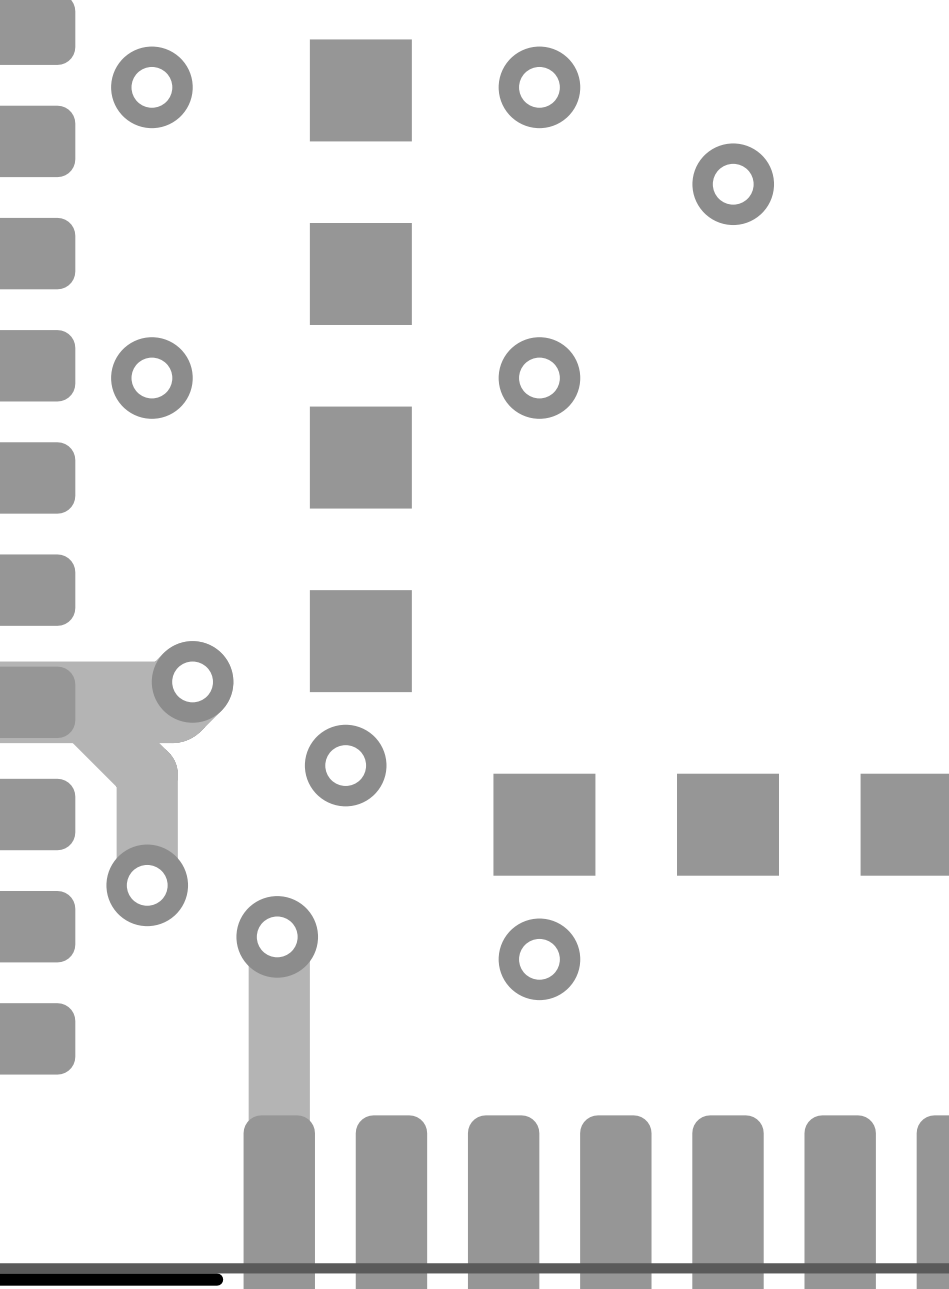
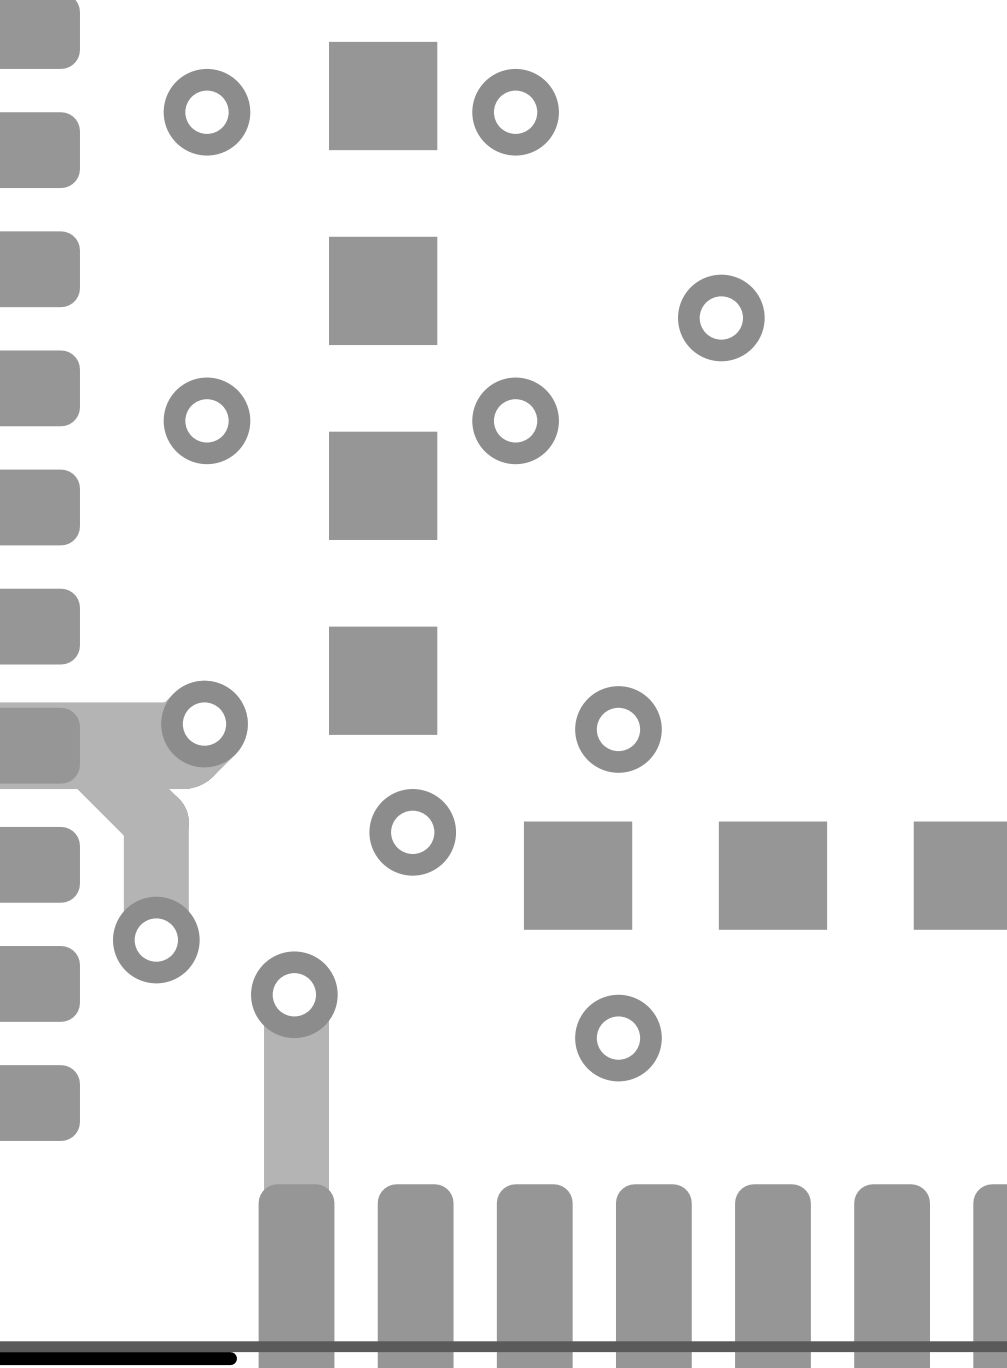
via position: (151, 87) -> (206, 112)
via position: (539, 87) -> (515, 112)
via: (733, 184) -> none
via: none -> (721, 317)
via position: (151, 378) -> (206, 420)
via position: (539, 378) -> (515, 420)
via: none -> (618, 729)
via position: (345, 765) -> (412, 832)
via position: (539, 959) -> (618, 1038)

